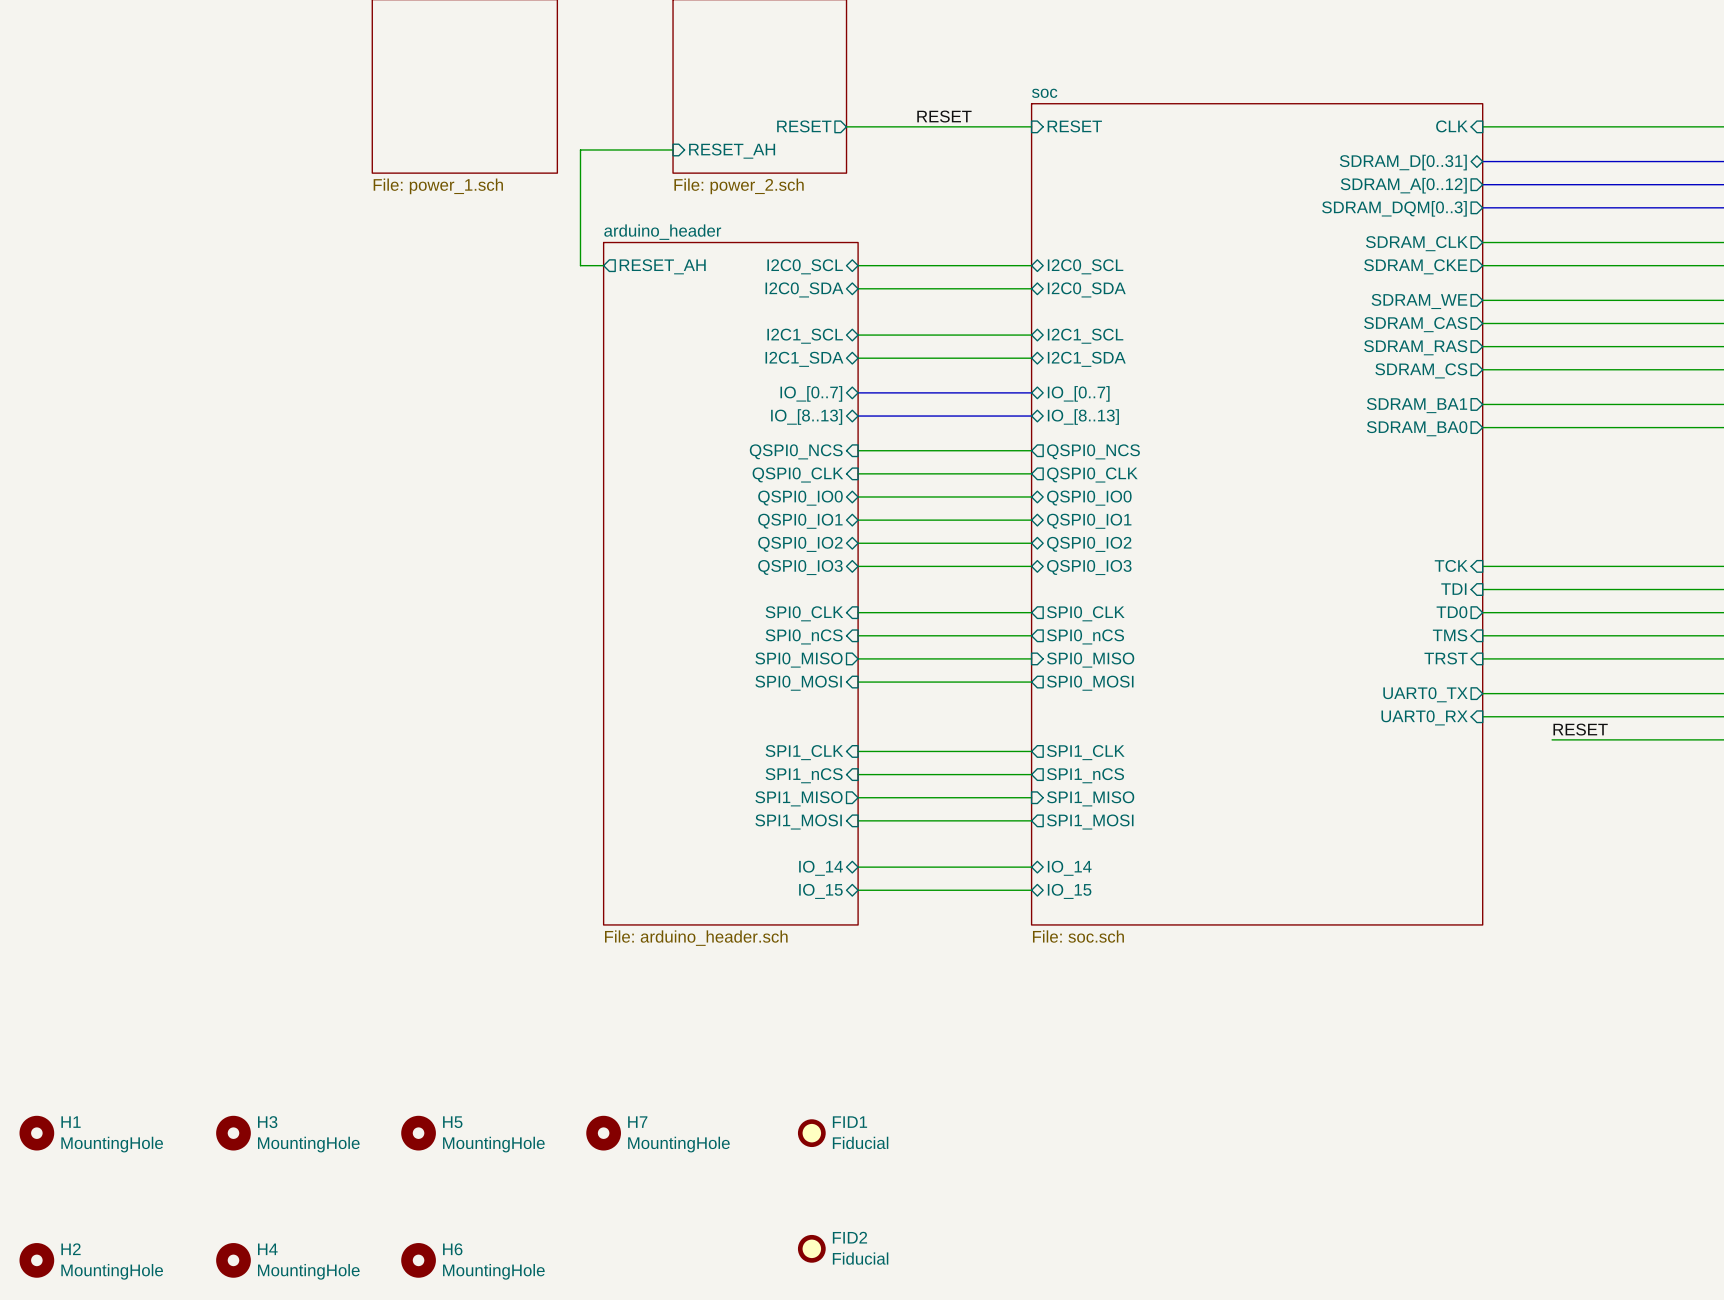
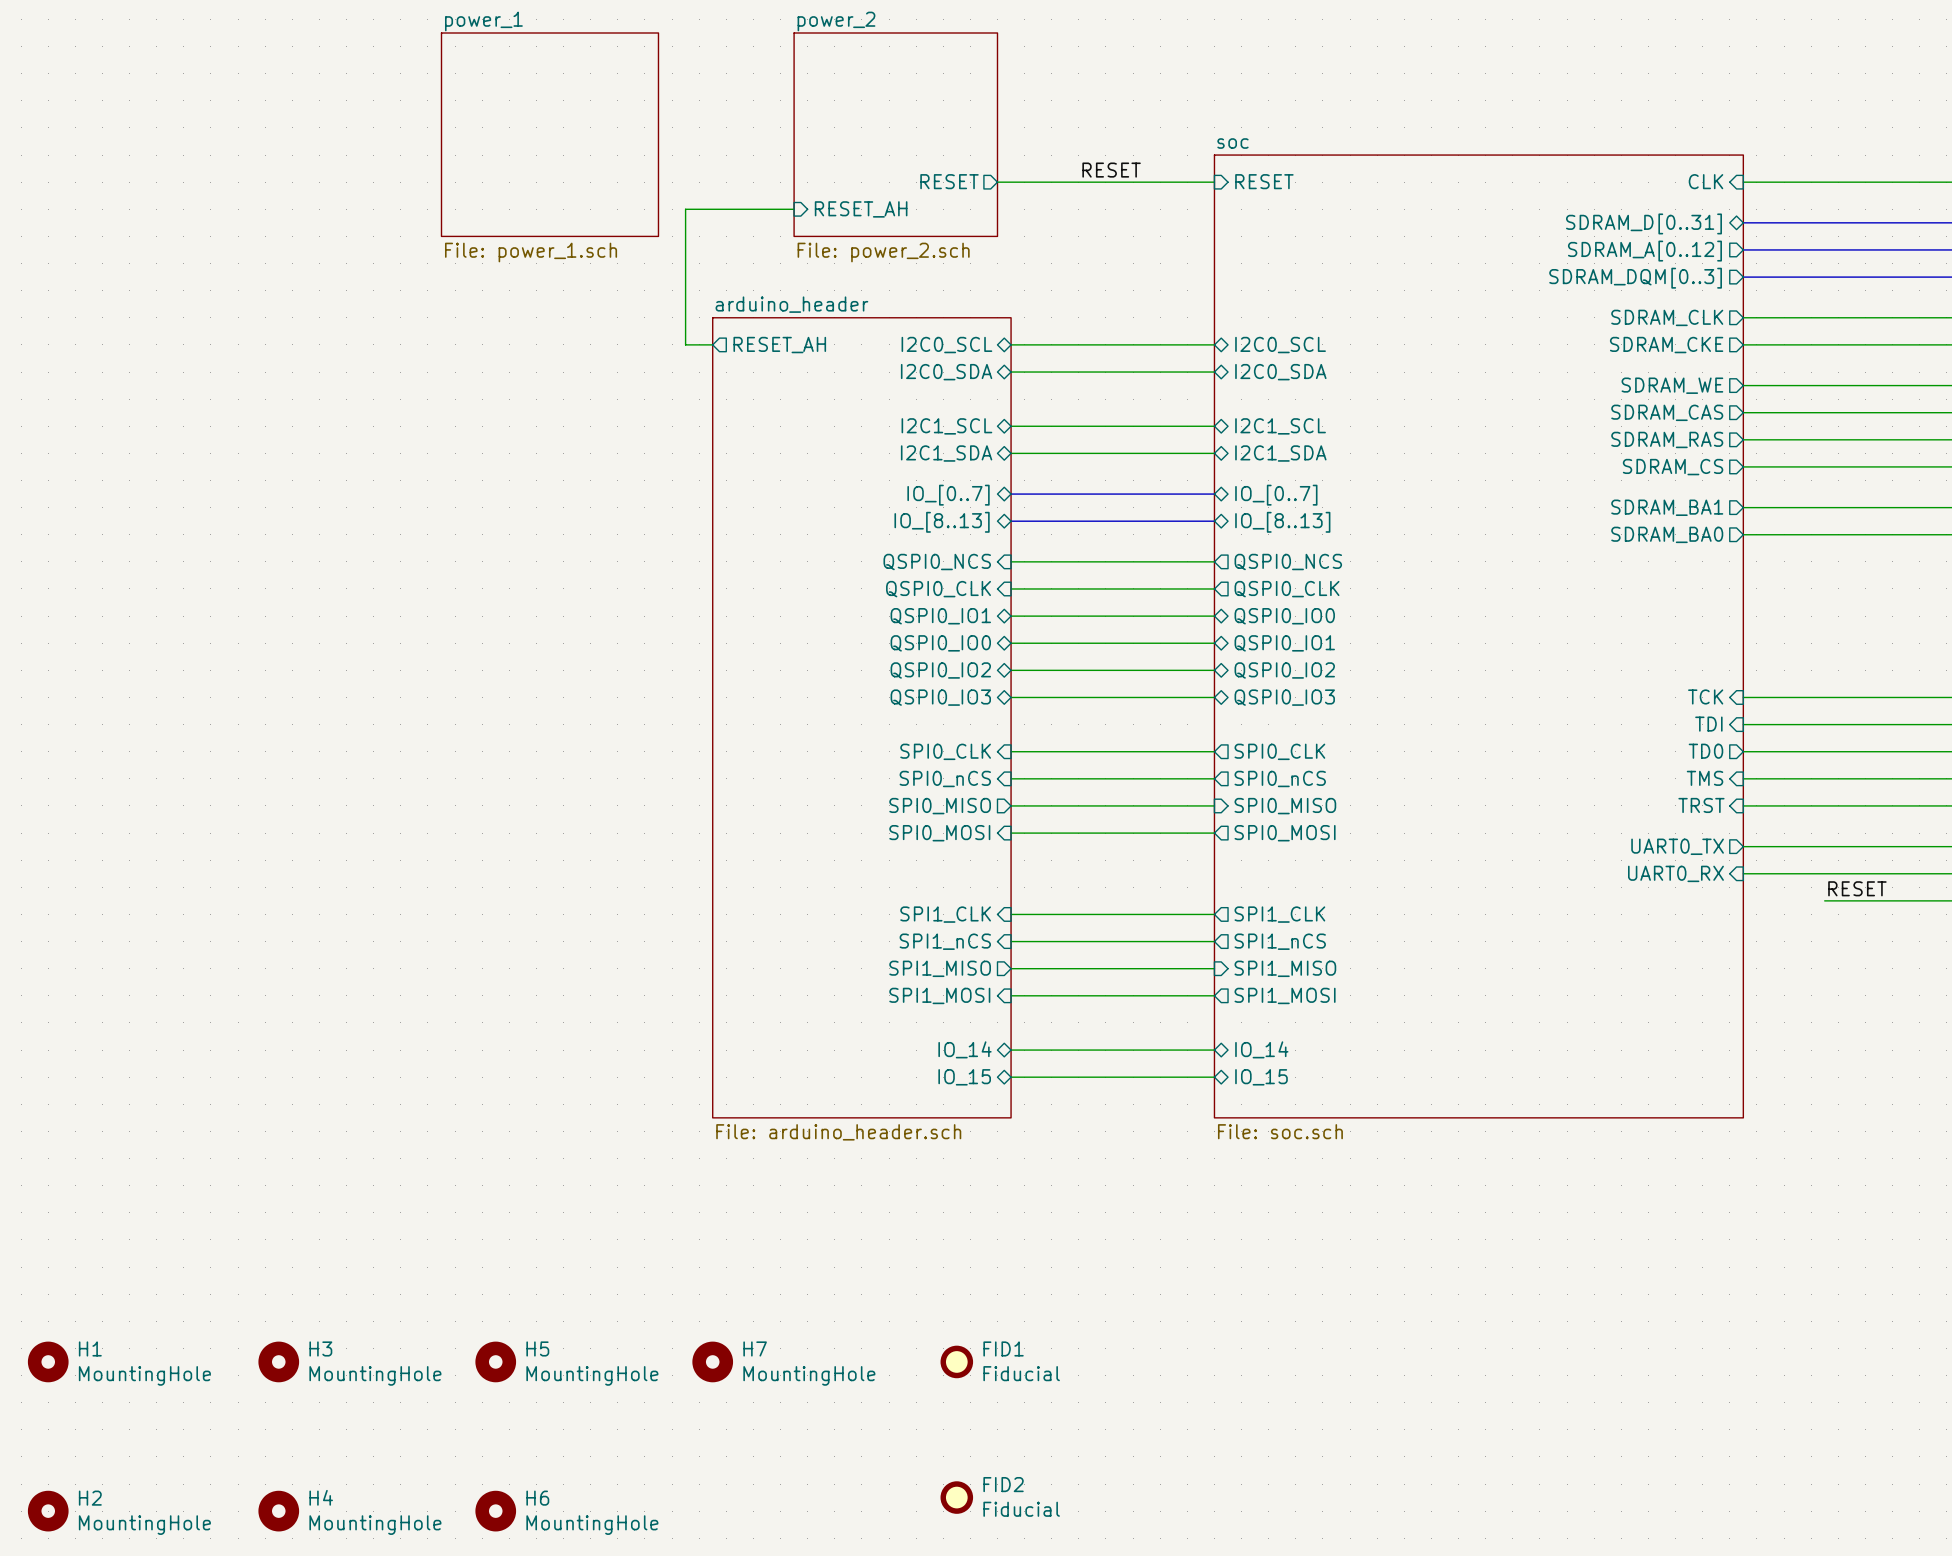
sheet pin: QSPI0_IO0 (800, 498) -> QSPI0_IO1 (940, 616)
sheet pin: QSPI0_IO1 (800, 521) -> QSPI0_IO0 (940, 643)

